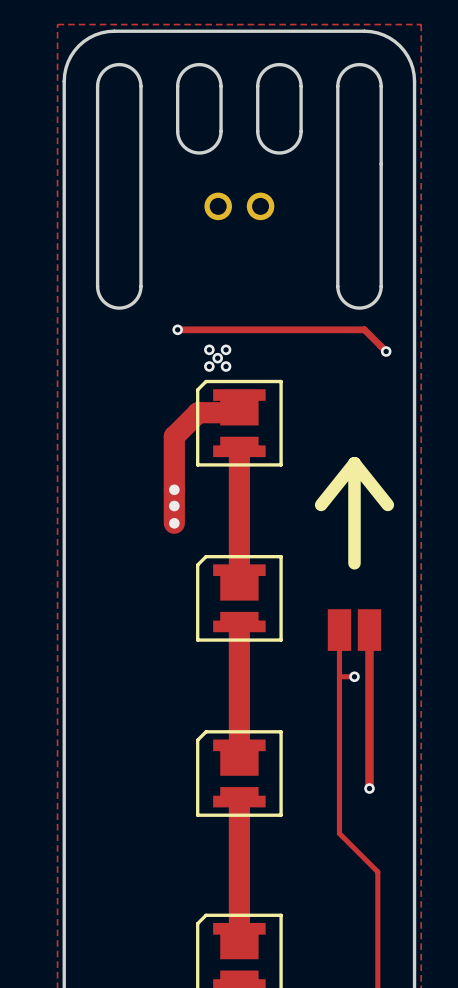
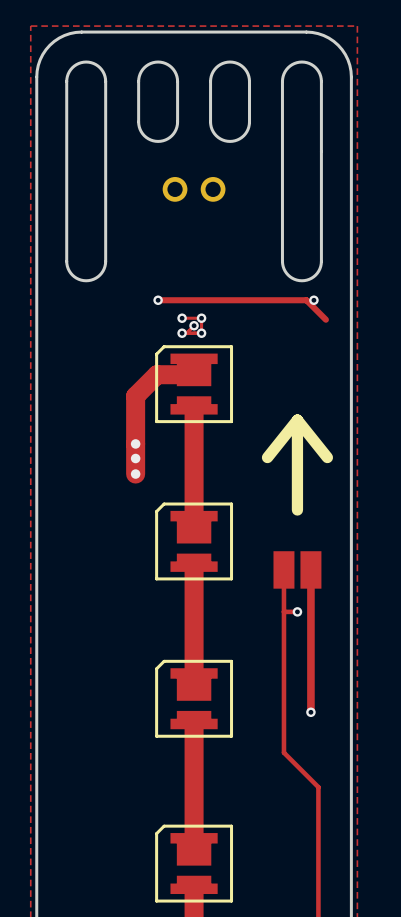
track: (177, 329) (199, 329) -> none
via: (177, 329) -> none
via: none -> (158, 300)
via: (209, 349) -> none
track: none -> (186, 318) (201, 318) (201, 333) (186, 333) (194, 325)
via: none -> (201, 318)
via position: (386, 351) -> (313, 300)
via: (217, 358) -> none
via: none -> (194, 325)
via: (209, 366) -> none
via: none -> (201, 333)

